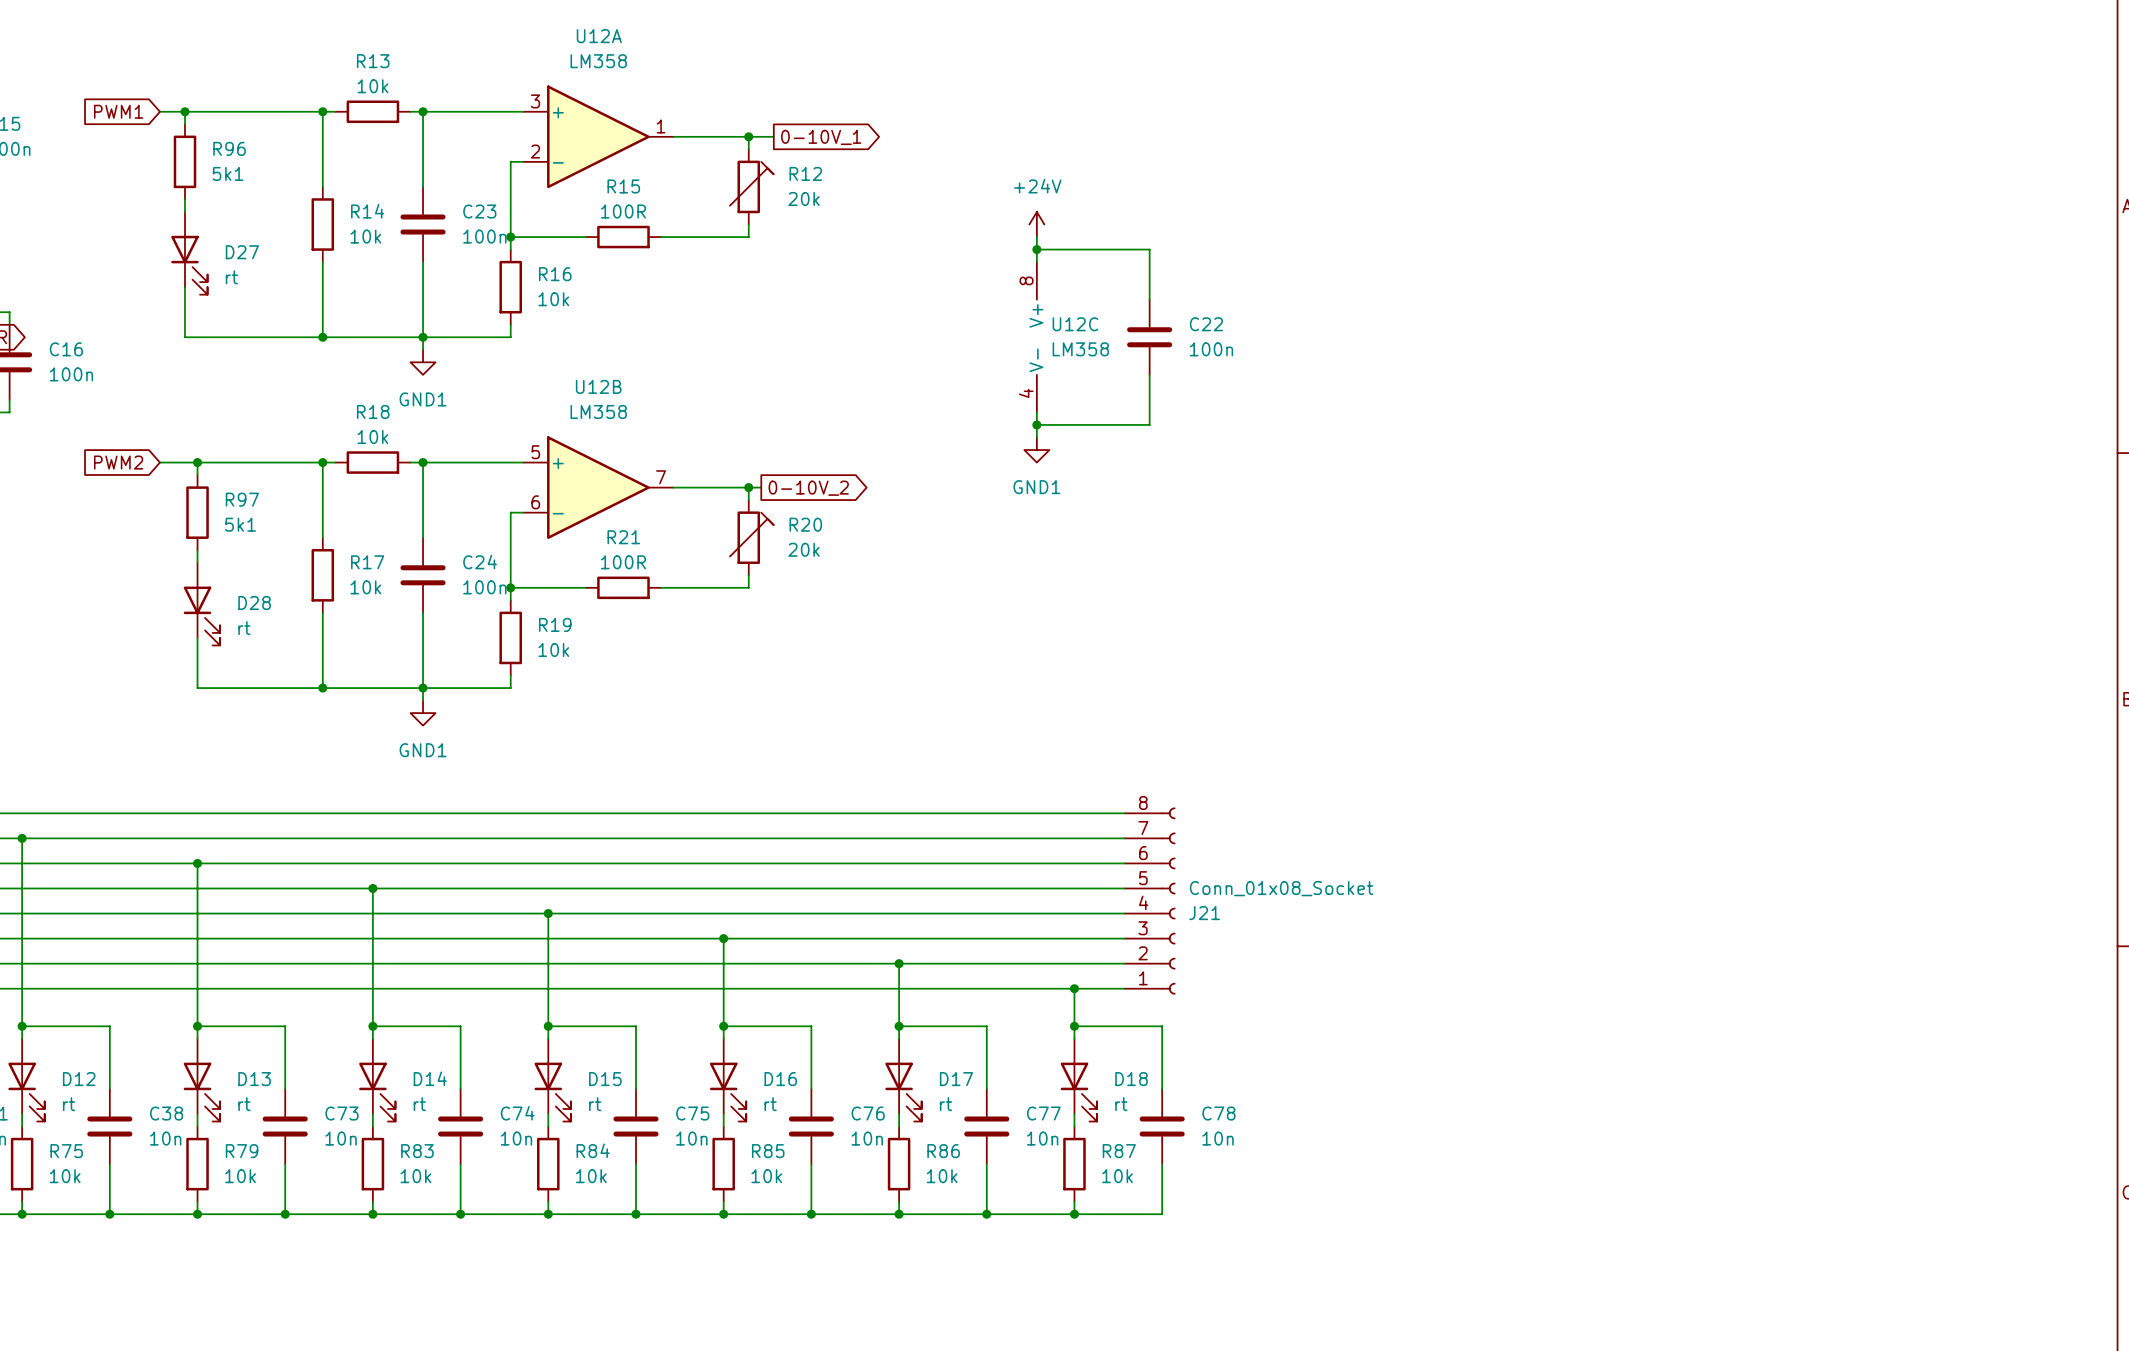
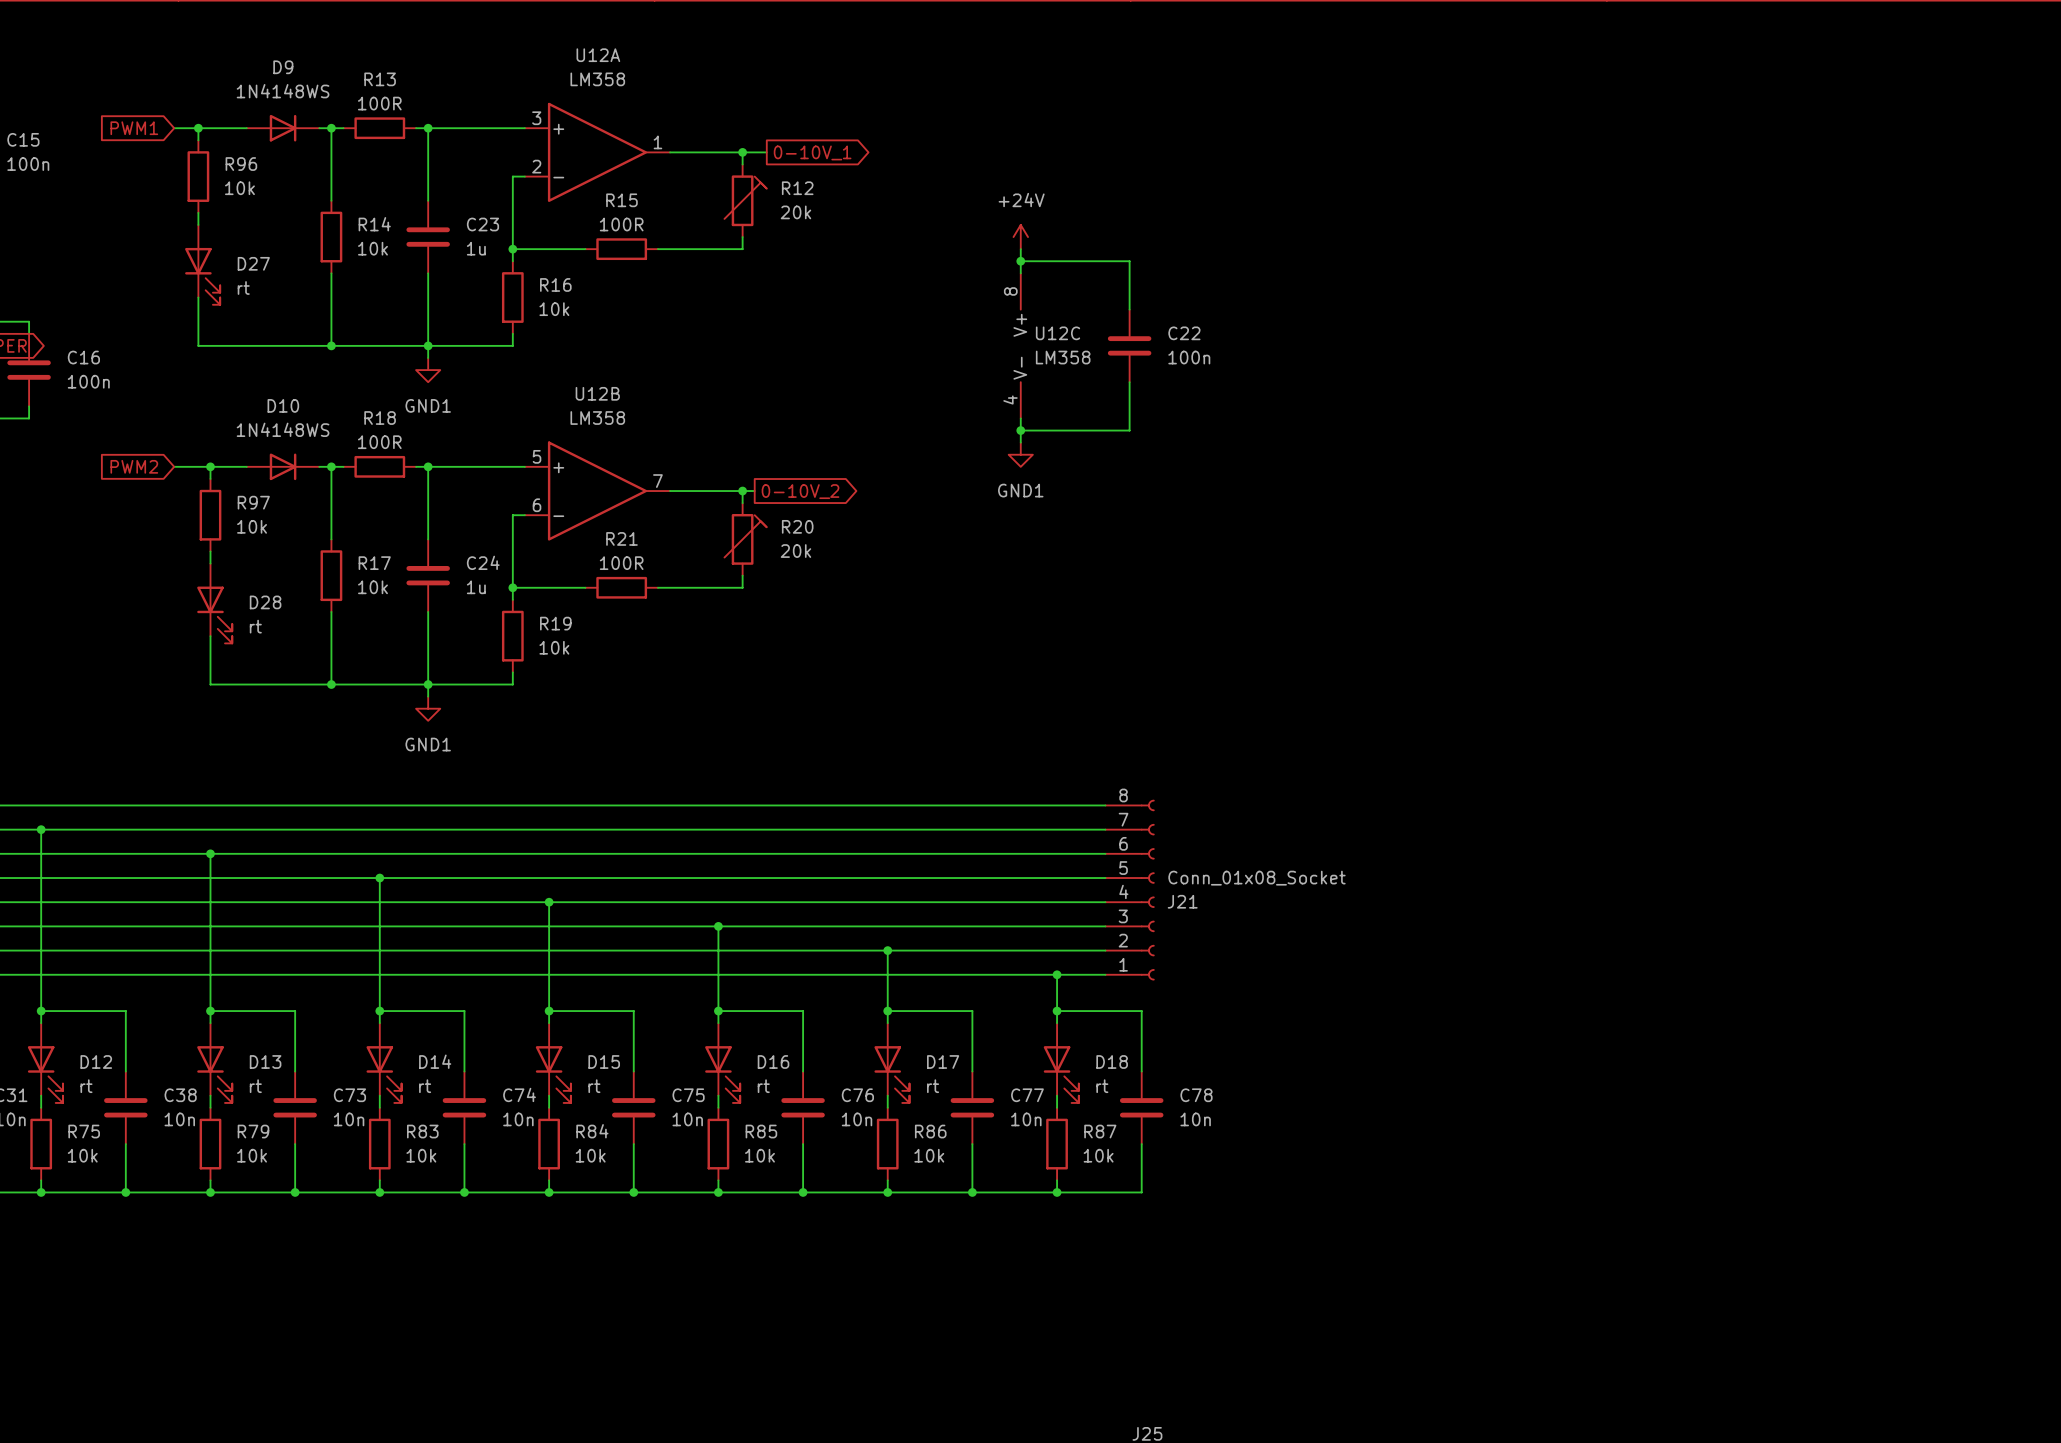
R13 value: 10k (372, 86) -> 100R (379, 103)
D9: none -> 1N4148WS (283, 128)
R96 value: 5k1 (228, 173) -> 10k (239, 188)
C23 value: 100n (484, 236) -> 1u (476, 248)
R18 value: 10k (372, 437) -> 100R (379, 442)
D10: none -> 1N4148WS (283, 466)
R97 value: 5k1 (240, 524) -> 10k (252, 526)
C24 value: 100n (484, 587) -> 1u (476, 587)

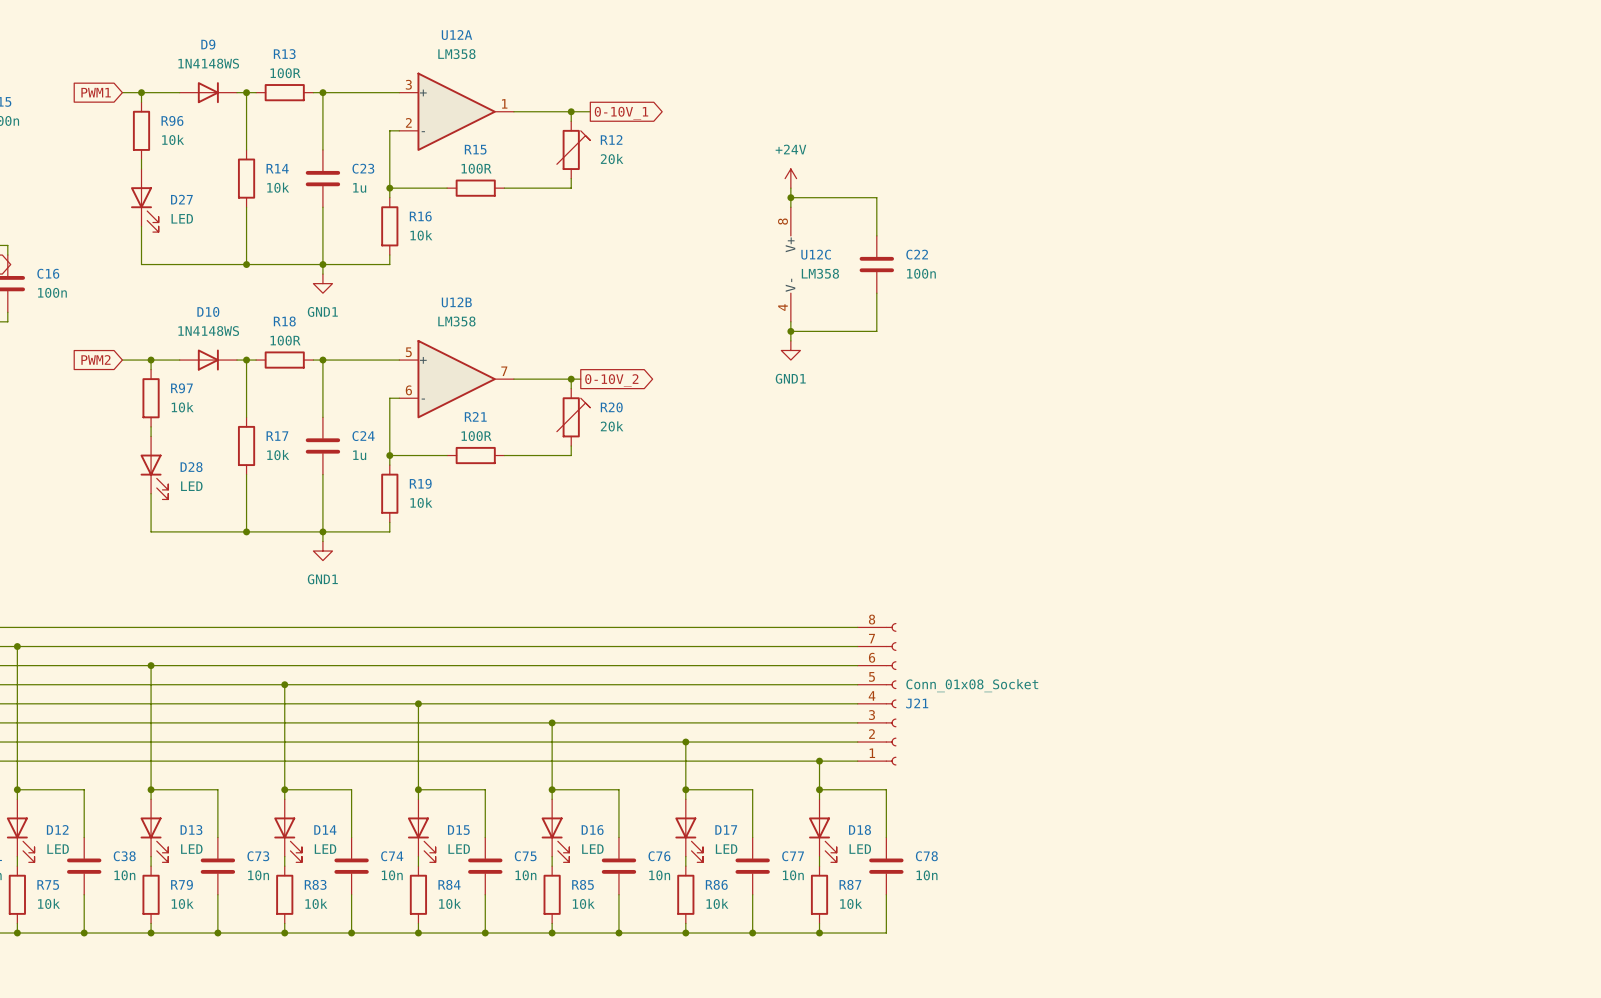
D27 value: rt (243, 288) -> LED (182, 218)
D28 value: rt (255, 626) -> LED (191, 486)
D12 value: rt (86, 1086) -> LED (58, 849)
D13 value: rt (255, 1086) -> LED (191, 849)
D14 value: rt (425, 1086) -> LED (325, 849)
D15 value: rt (594, 1086) -> LED (459, 849)
D16 value: rt (763, 1086) -> LED (592, 849)
D17 value: rt (933, 1086) -> LED (726, 849)
D18 value: rt (1102, 1086) -> LED (860, 849)

